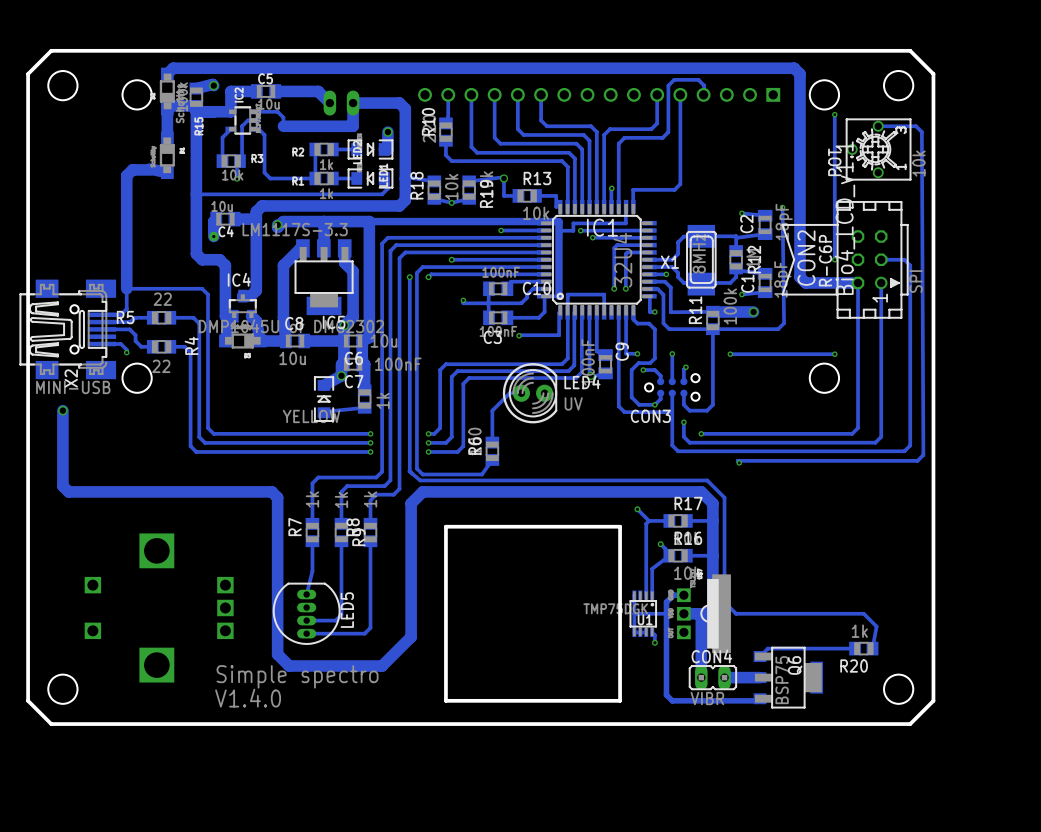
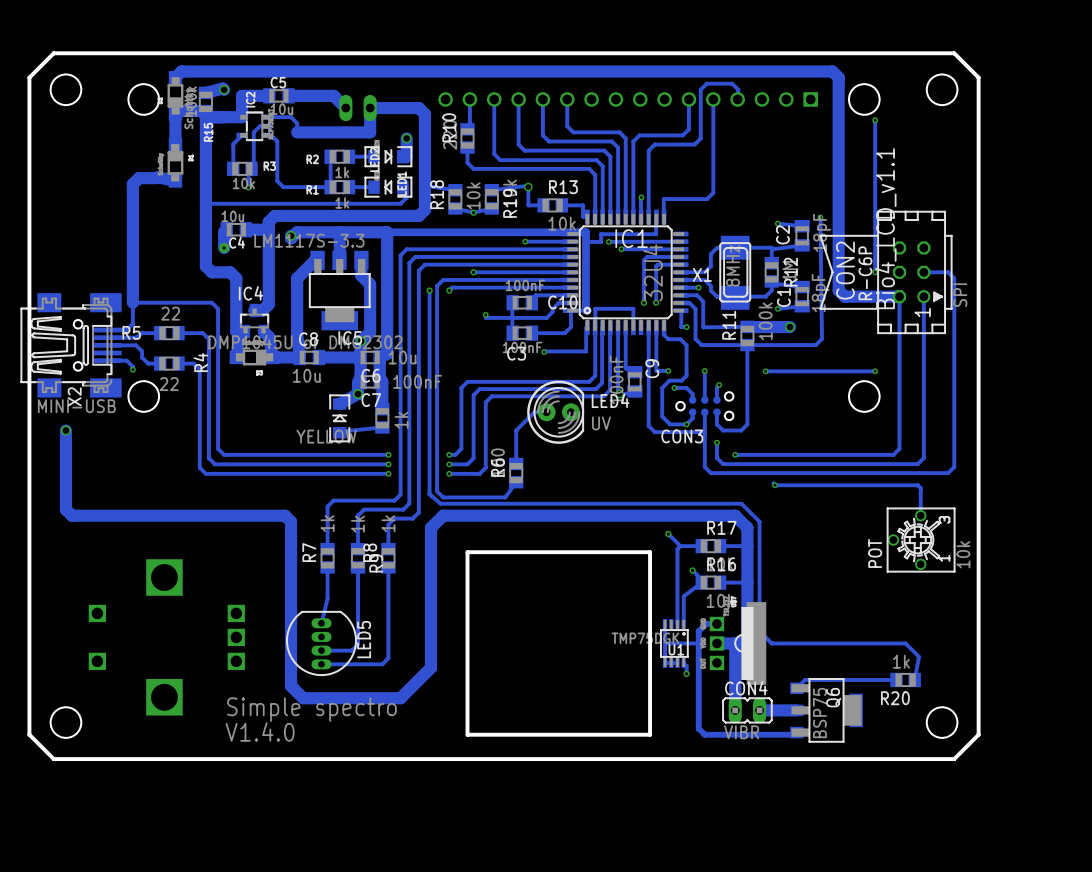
track: (878, 126) (916, 126) (921, 132) (923, 455) (917, 460) (737, 460) -> none
POT: 10k (878, 149) -> none
track: none -> (775, 485) (917, 485) (920, 488) (920, 515)
POT: none -> 10k (921, 540)

